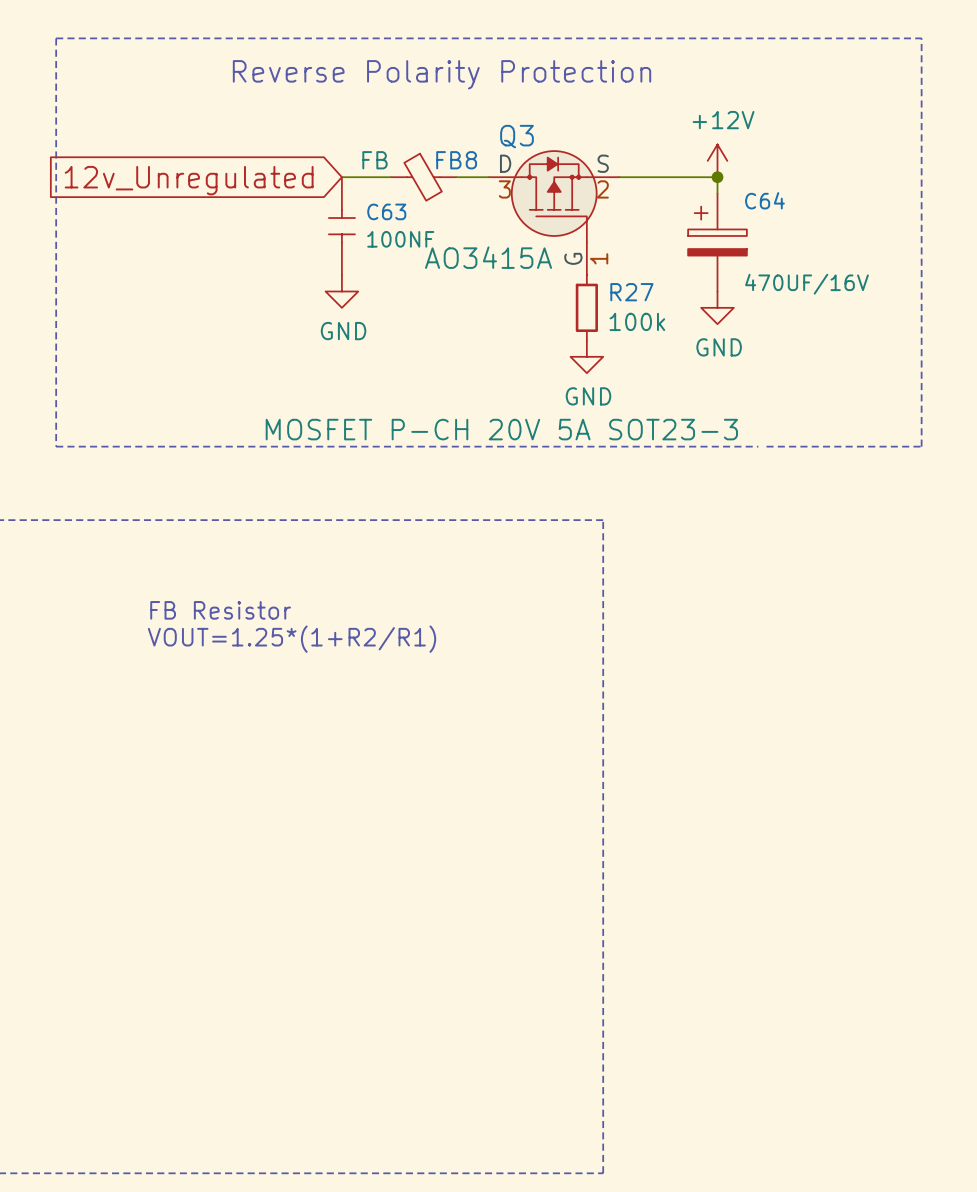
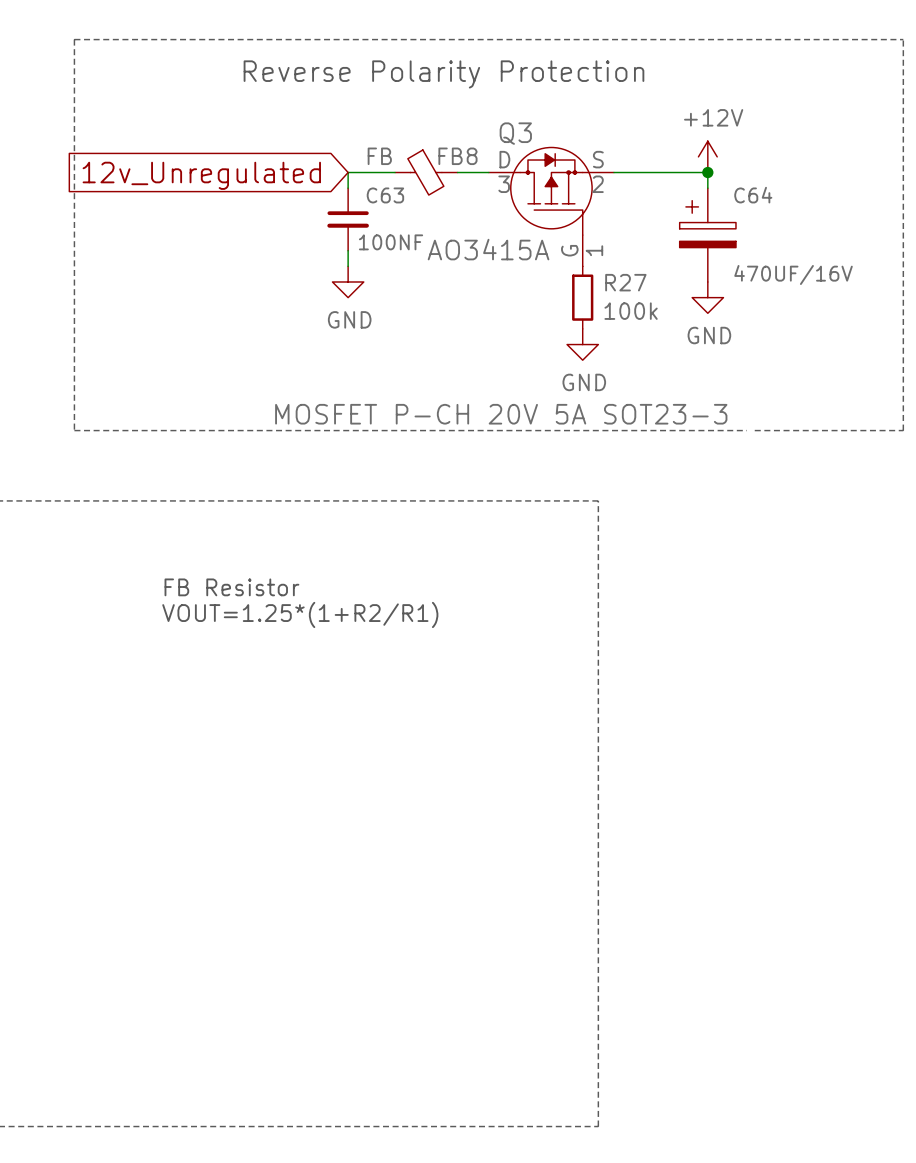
C63 symbol: [328, 177, 355, 276] -> [327, 188, 369, 251]

